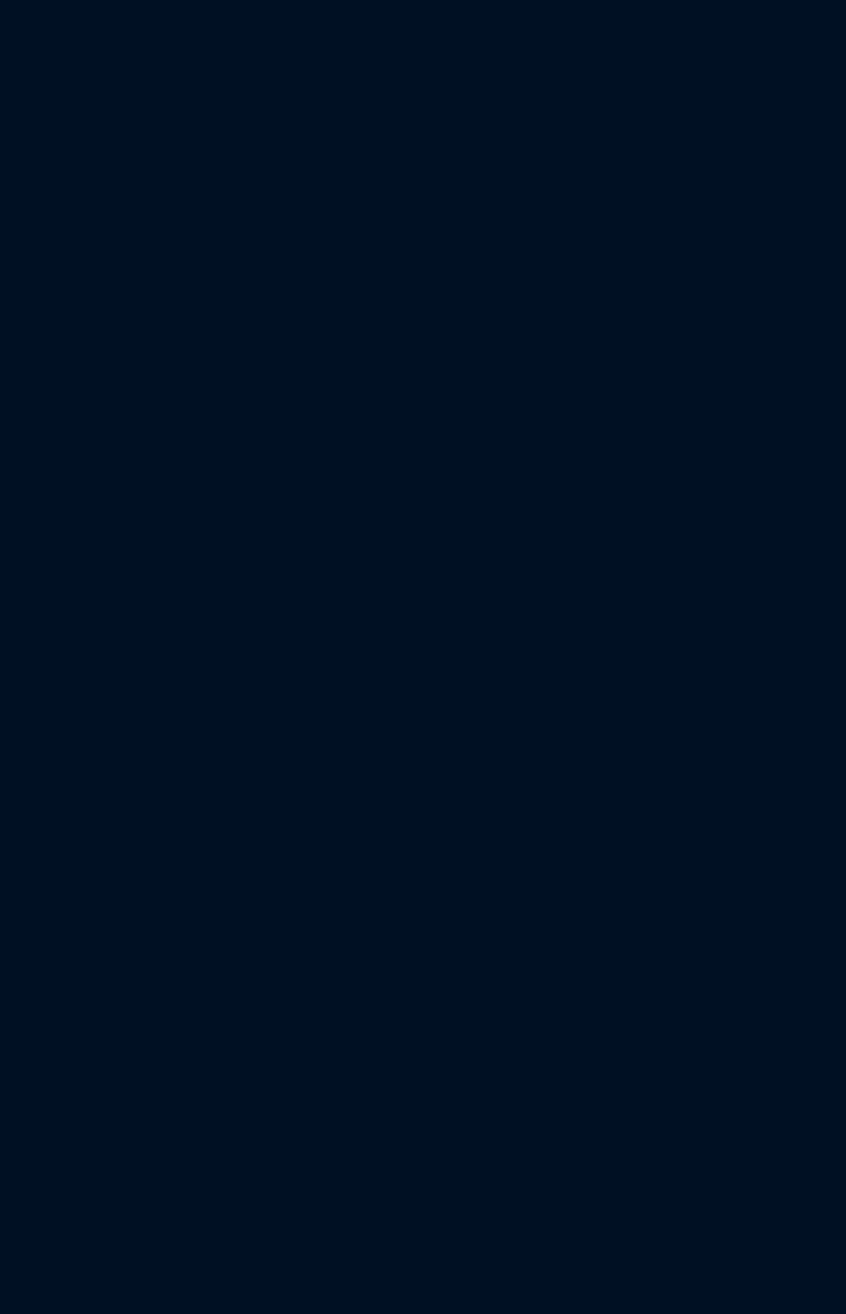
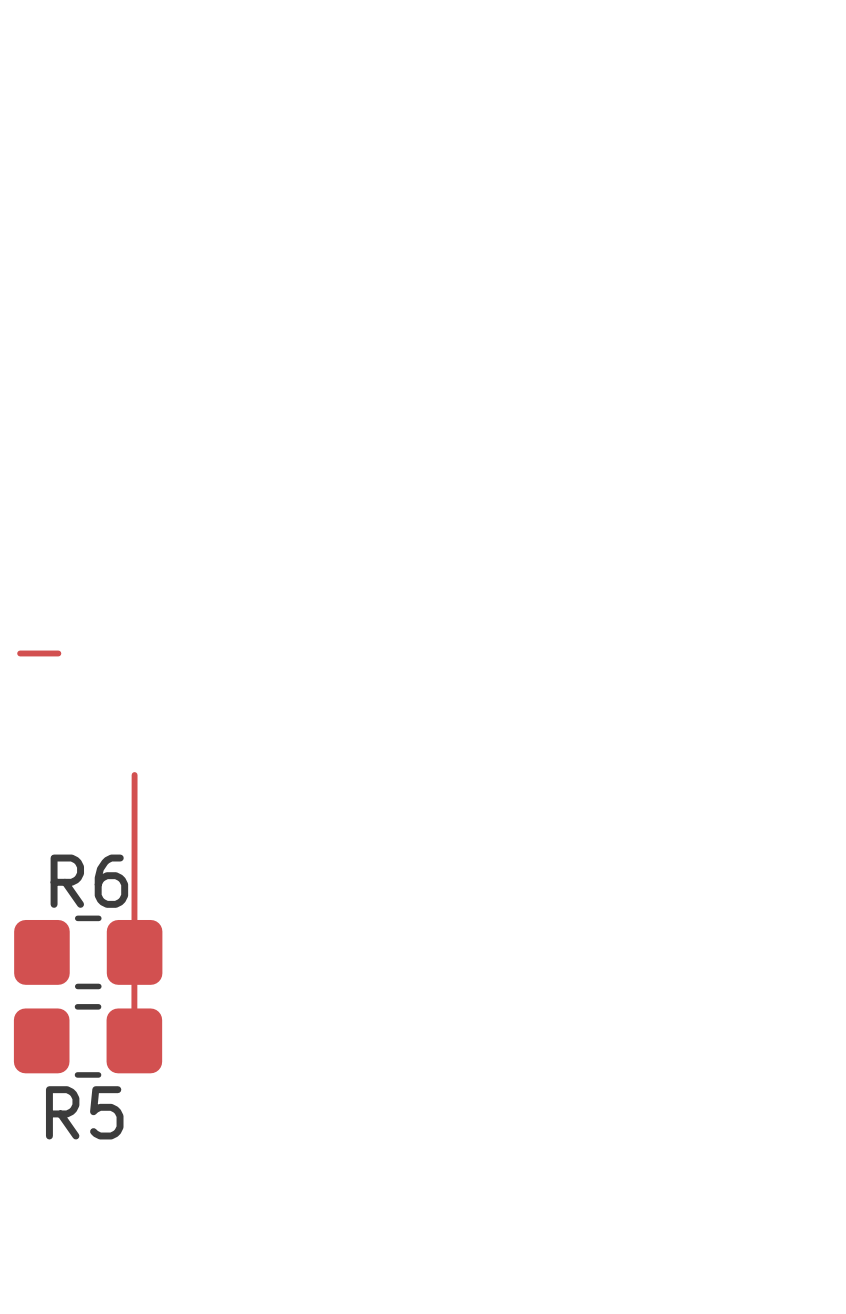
top track: none -> (20, 653) (58, 653)
top track: none -> (134, 775) (134, 1040)
R6: none -> (88, 952)
R5: none -> (88, 1040)

